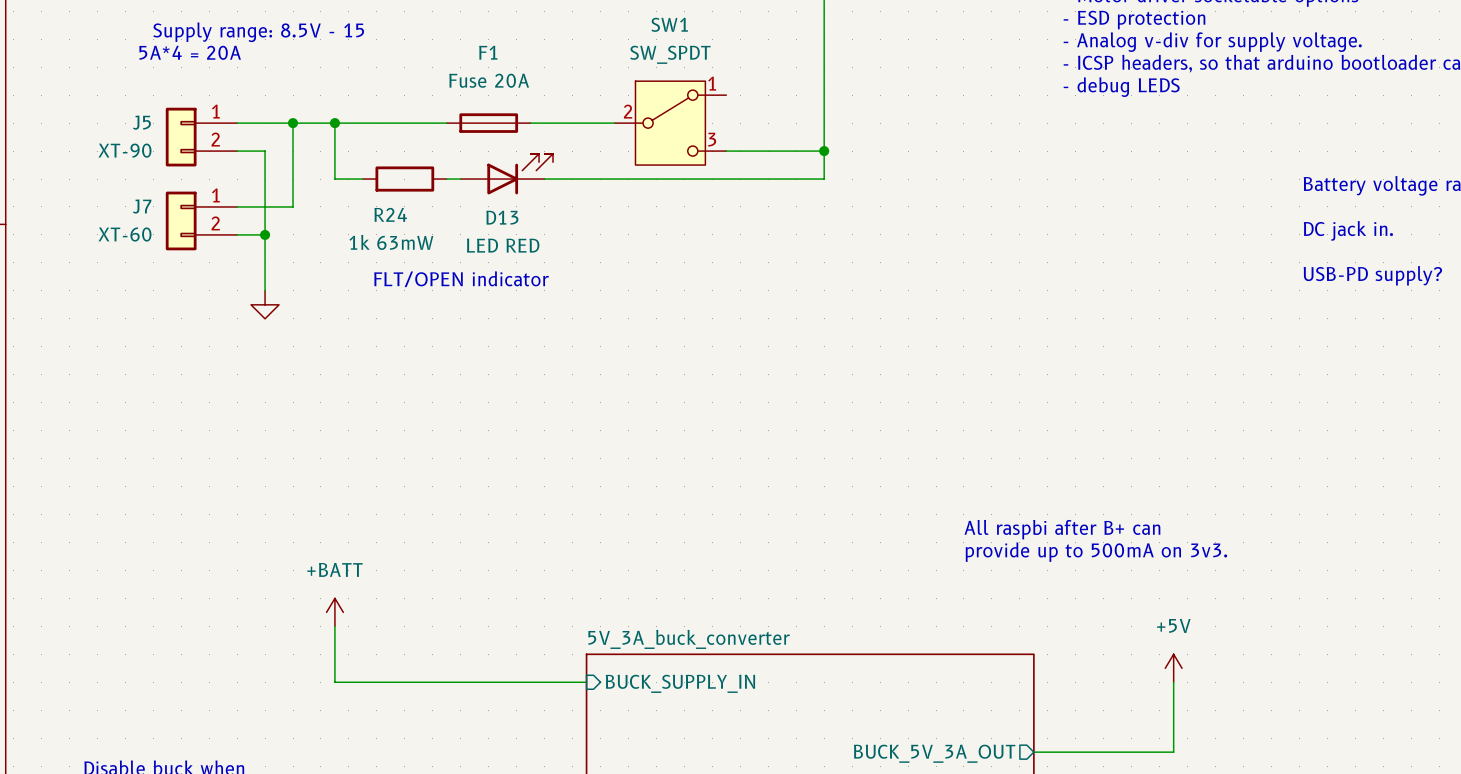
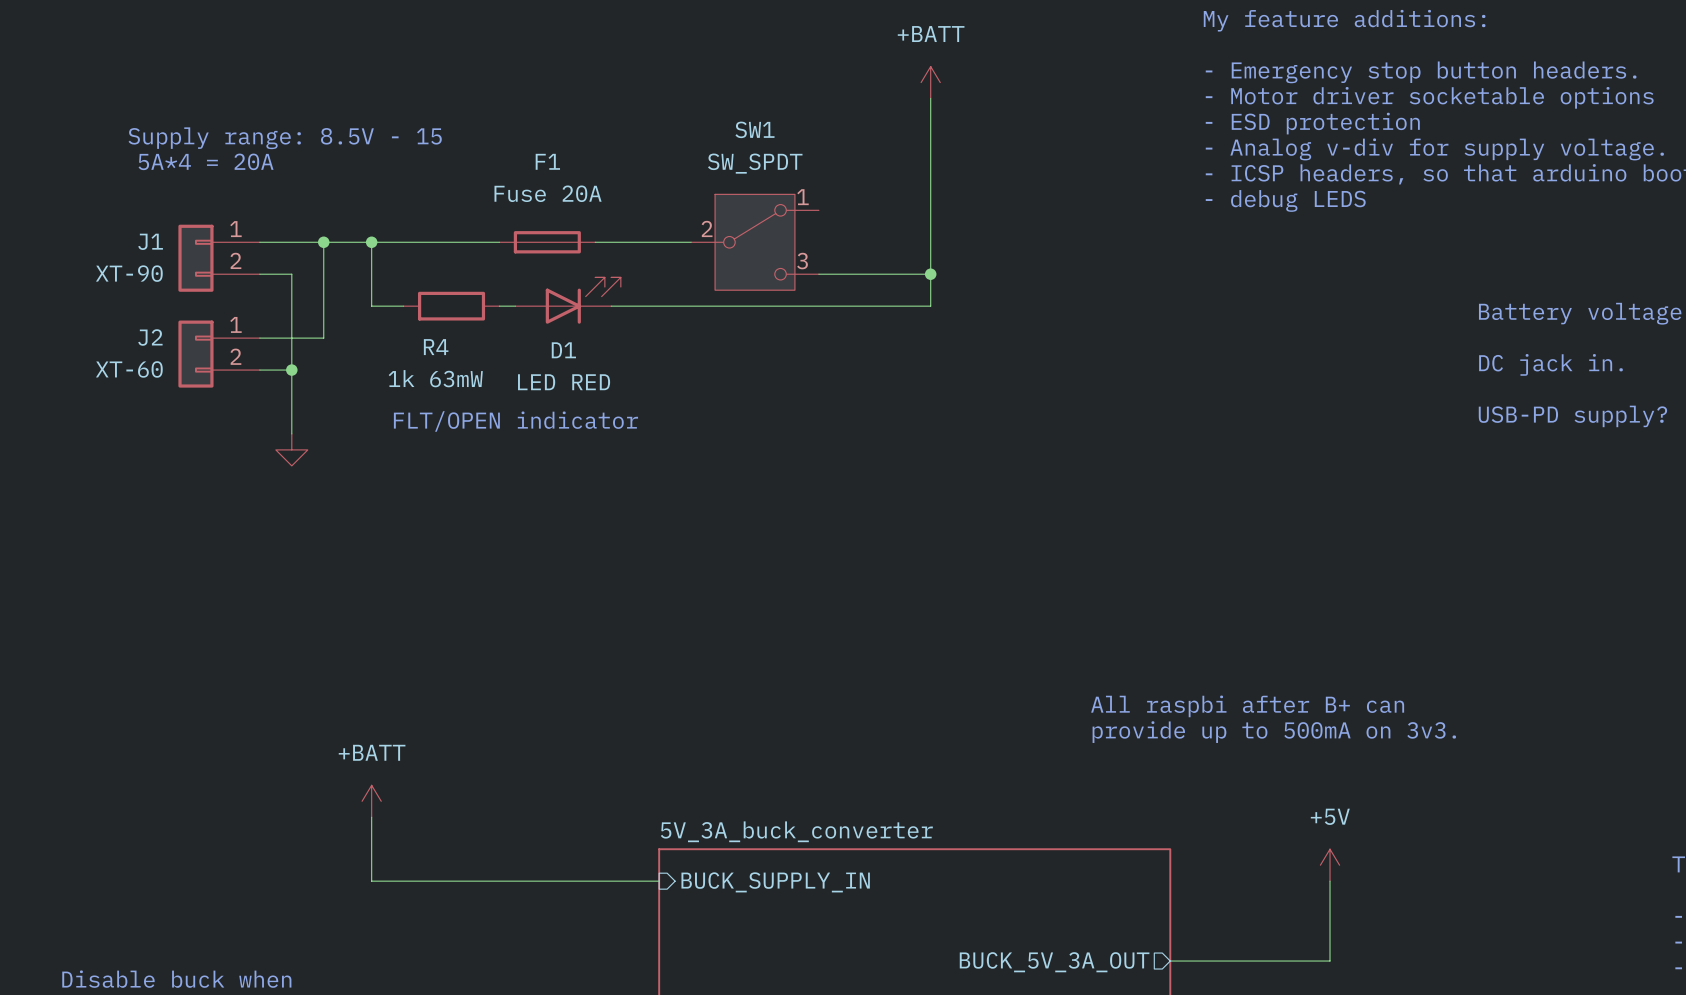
J5 name: J5 (141, 122) -> J1 (150, 241)
J7 name: J7 (142, 206) -> J2 (150, 337)
R24 name: R24 (390, 214) -> R4 (436, 347)
D13 name: D13 (502, 217) -> D1 (563, 350)

